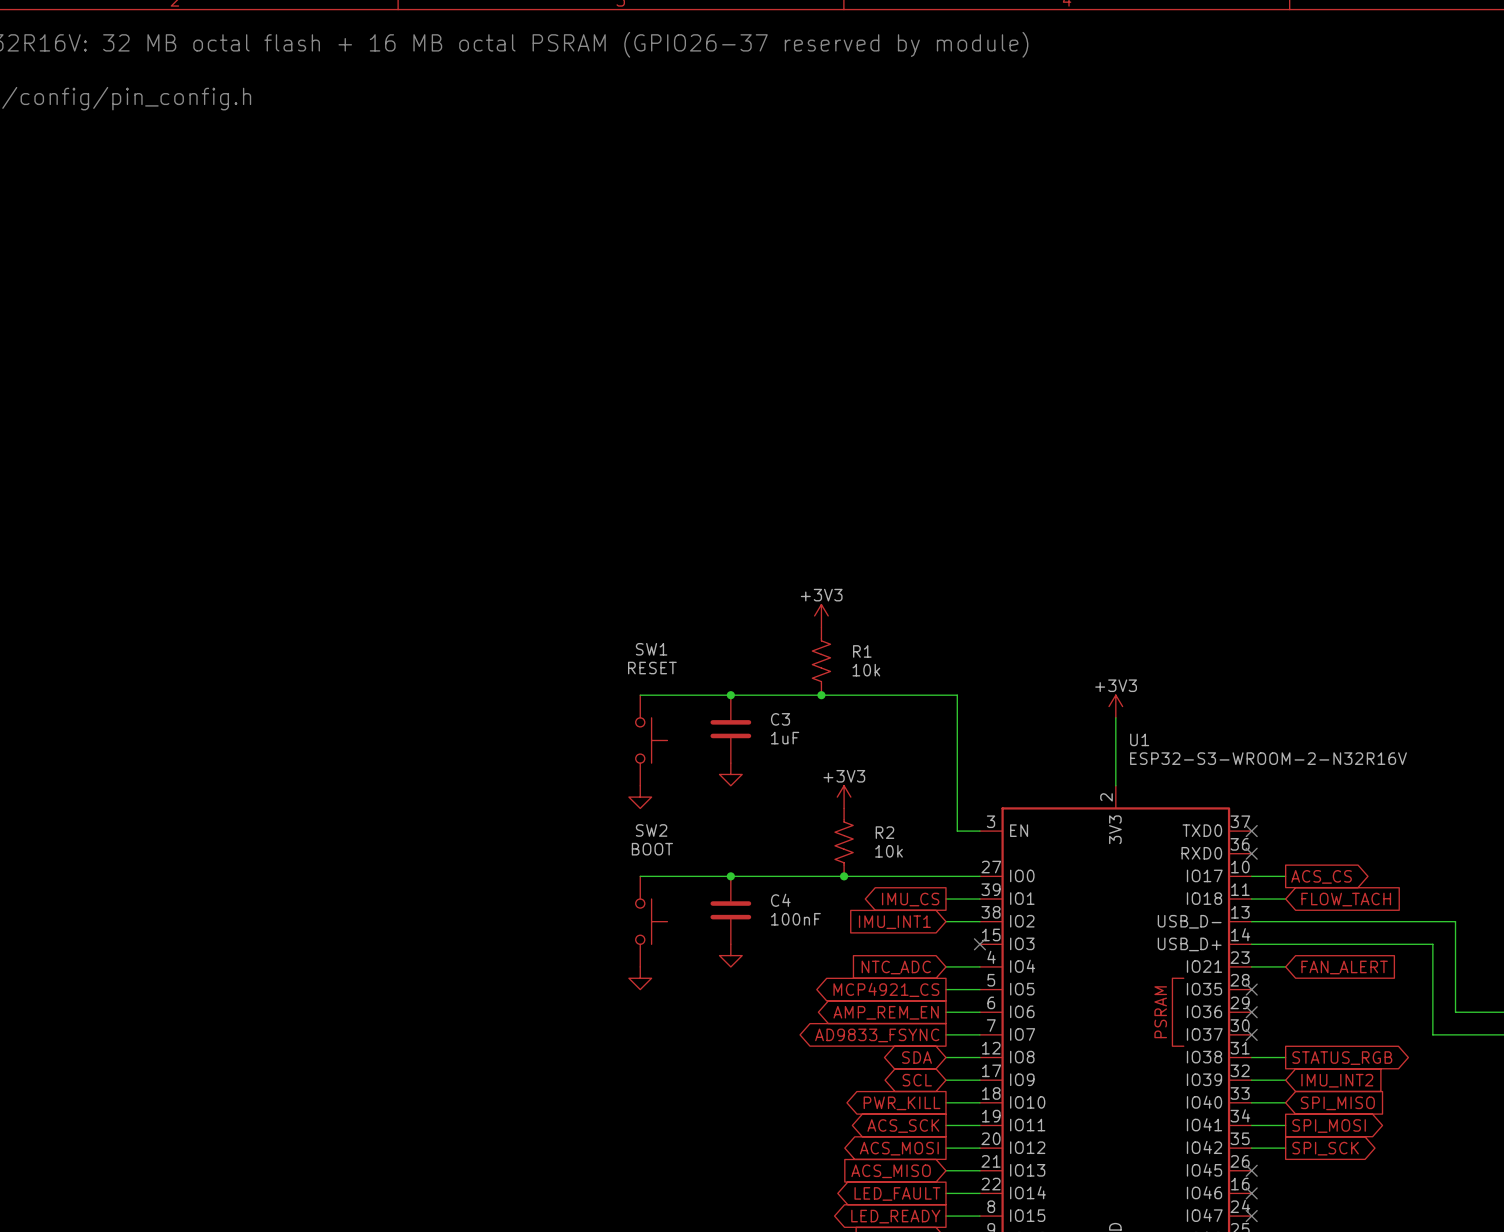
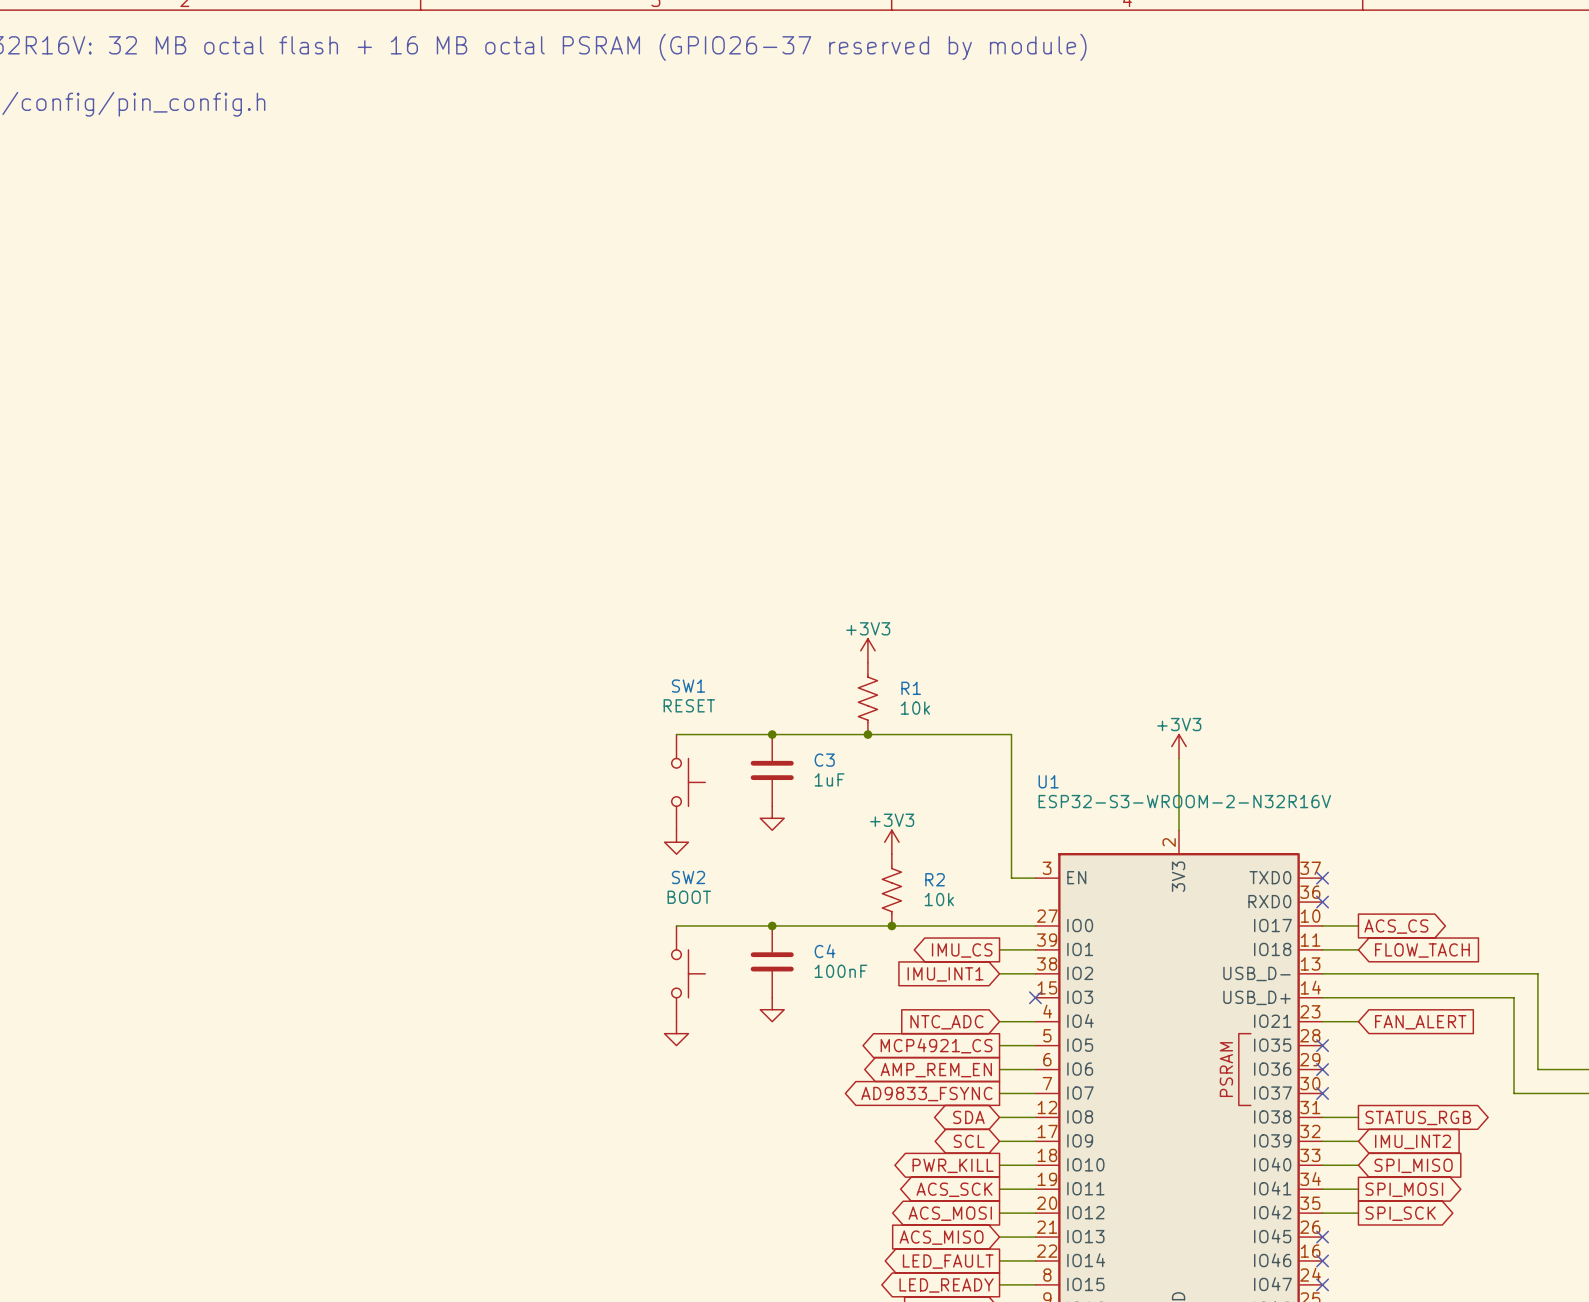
U1 name position: U1 (1139, 739) -> U1 (1048, 781)
U1 value position: ESP32-S3-WROOM-2-N32R16V (1268, 758) -> ESP32-S3-WROOM-2-N32R16V (1184, 801)

